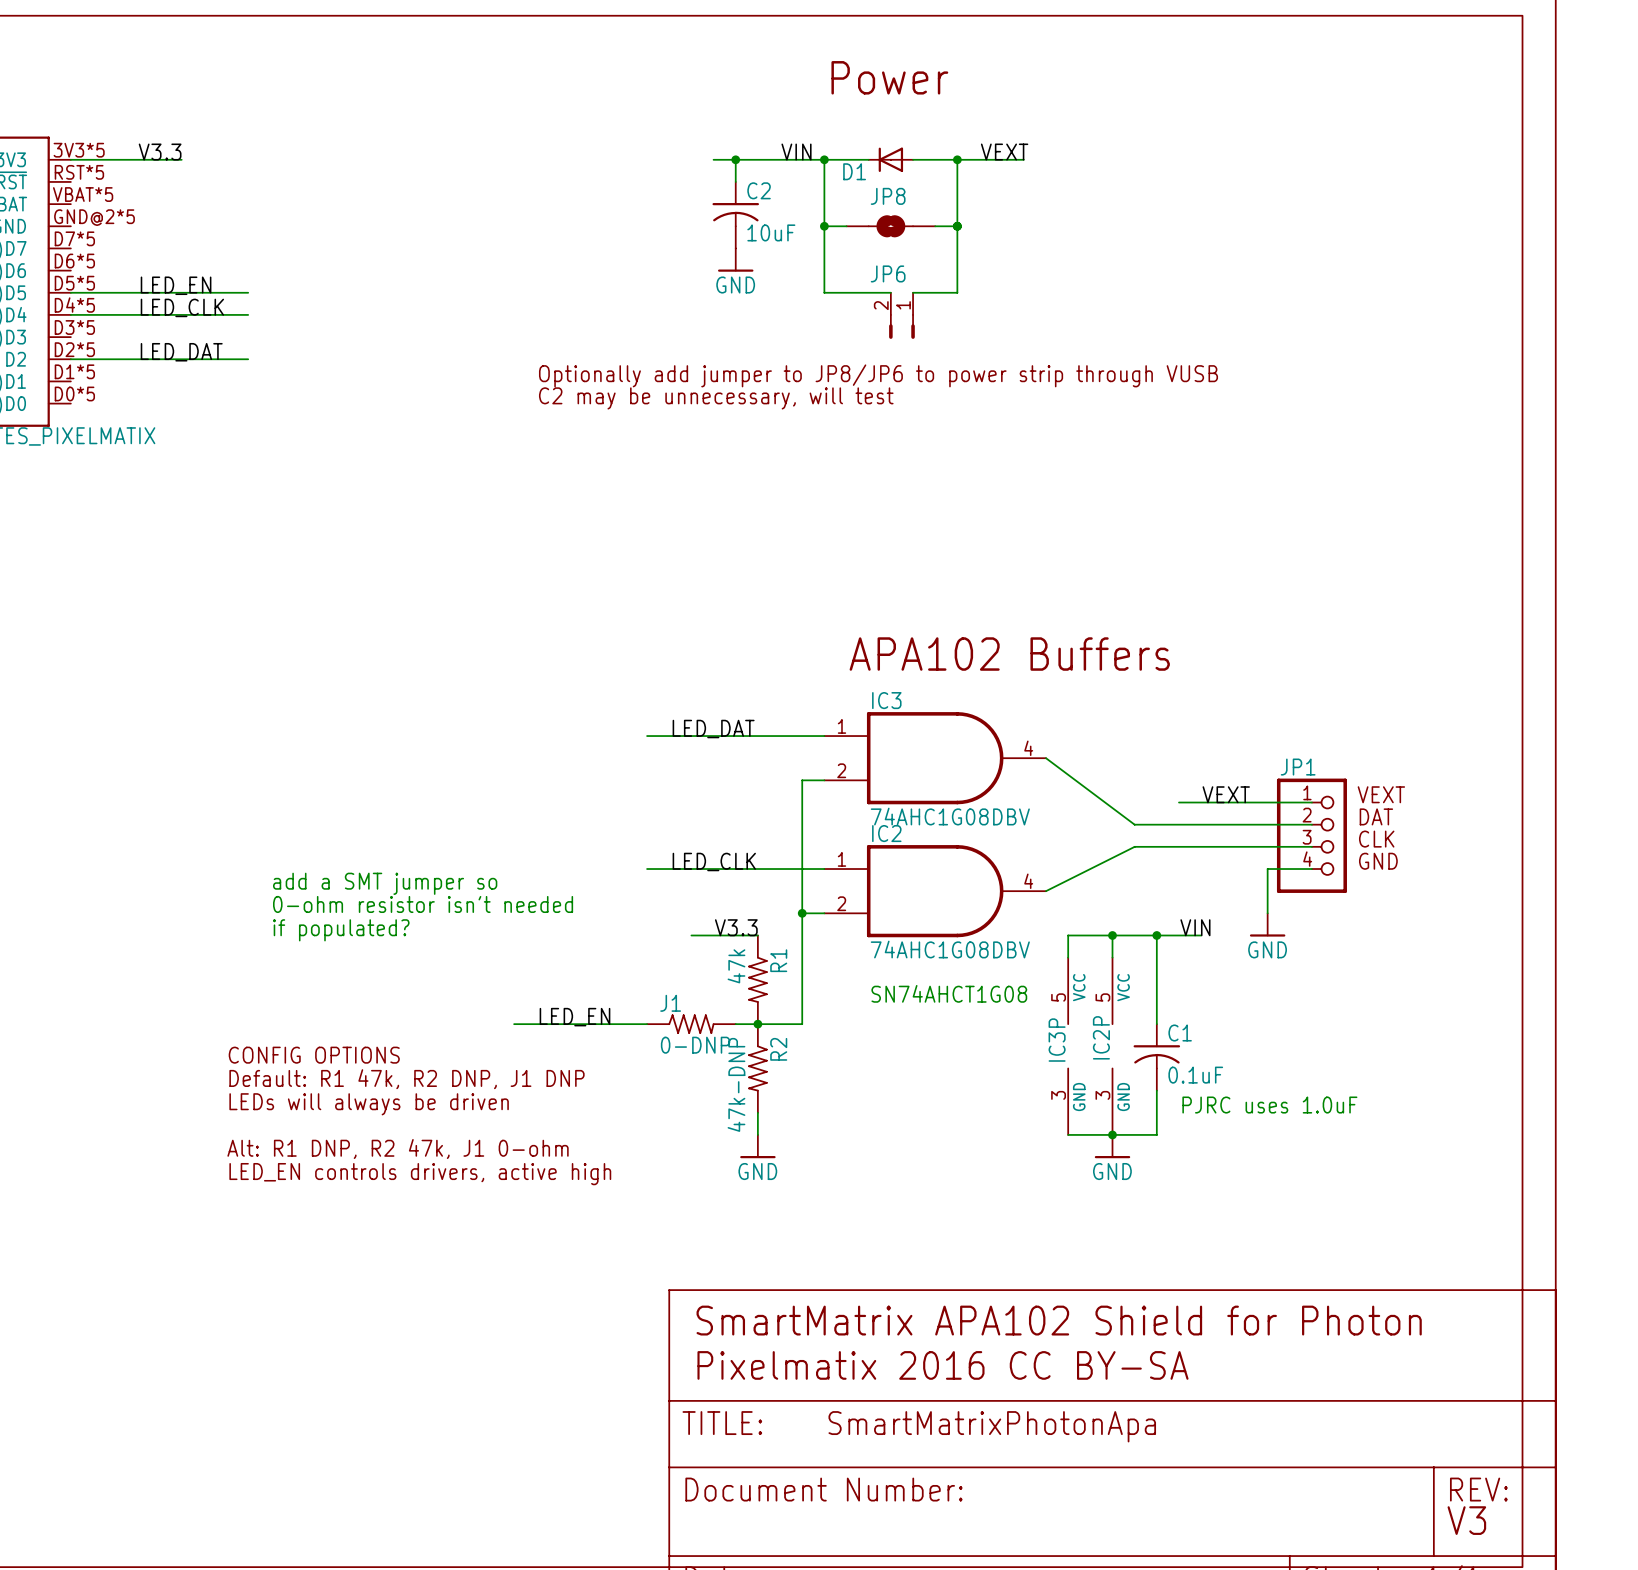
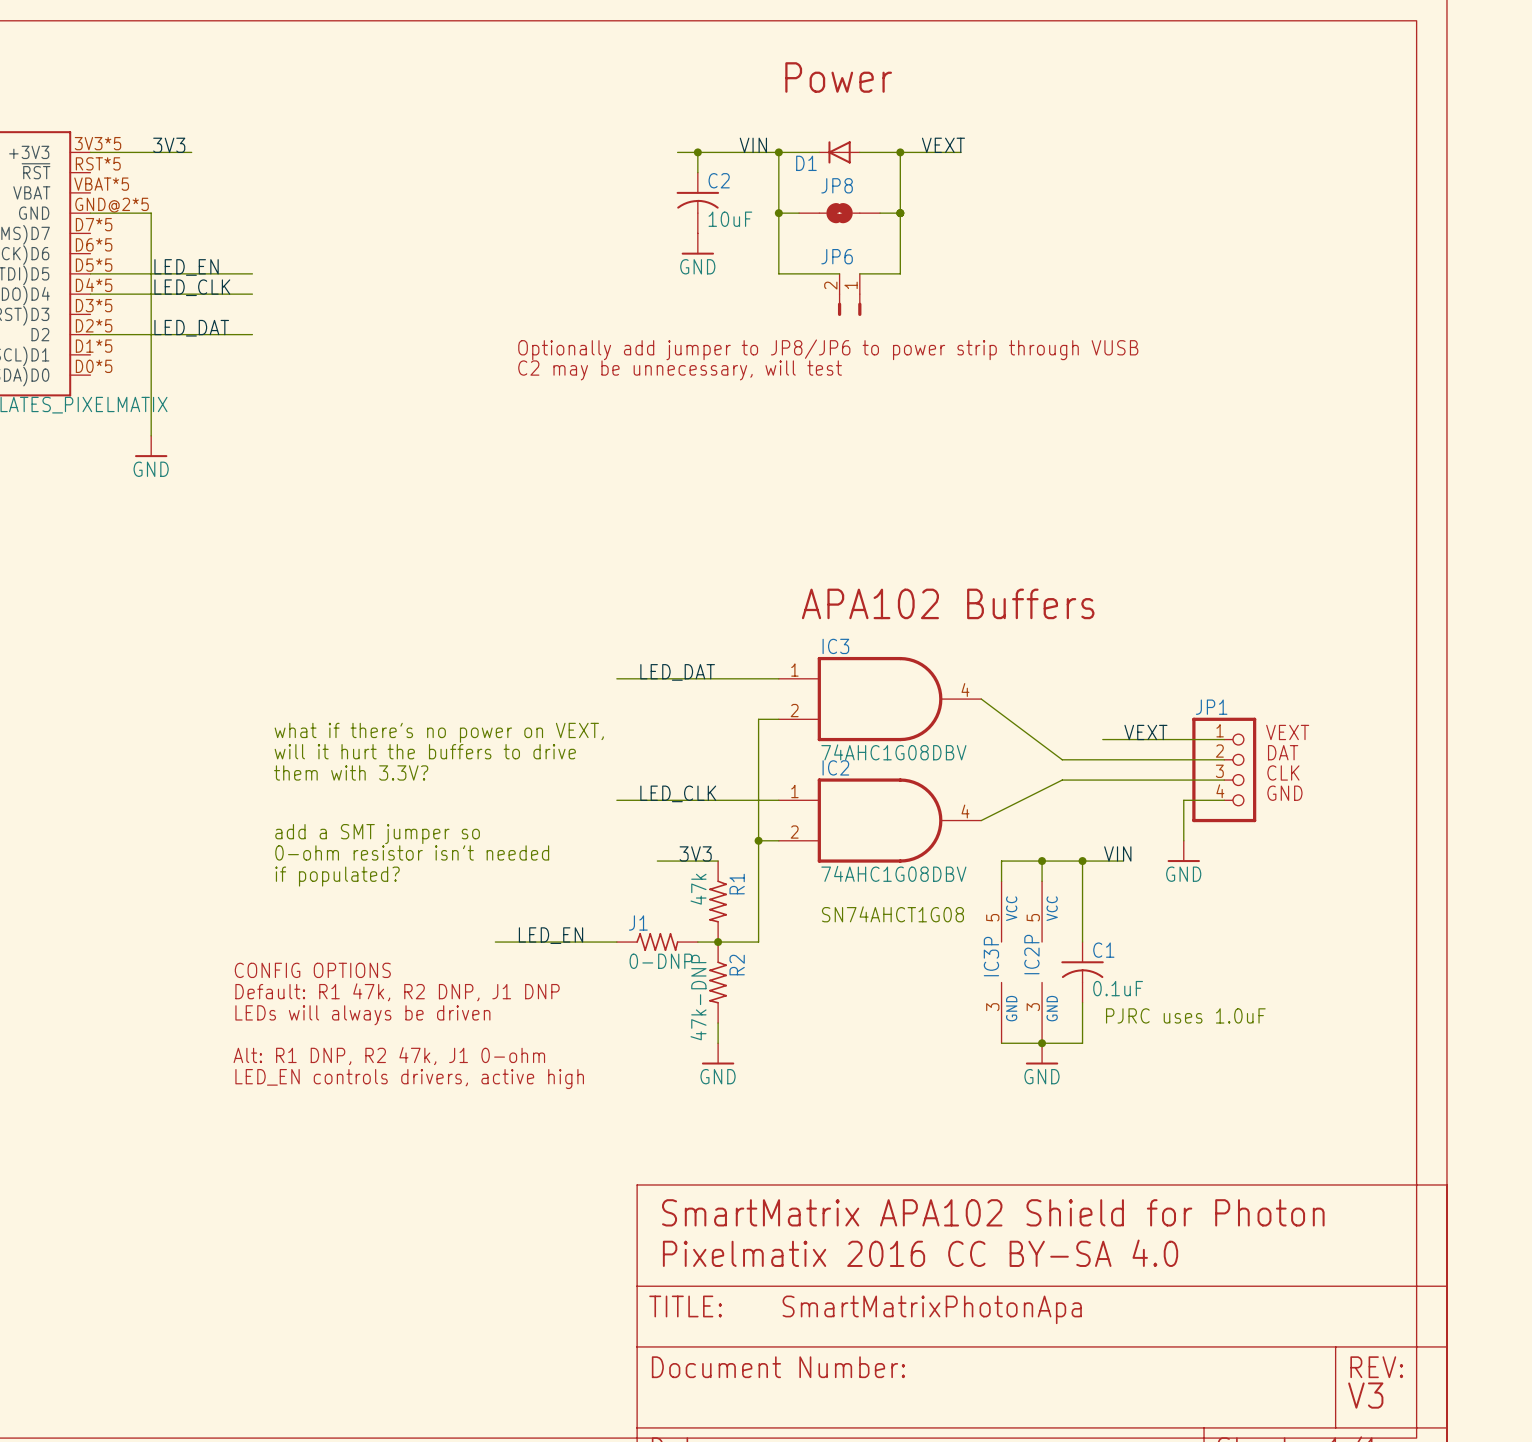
label: V3.3 (160, 152) -> 3V3 (169, 145)
wire: none -> (90, 213) (151, 213) (151, 435)
power symbol: none -> GND (151, 446)
text: none -> what if there's no power on VEXT, (439, 732)
text: none -> will it hurt the buffers to drive (425, 751)
text: none -> them with 3.3V? (351, 772)
text: add a SMT jumper so (385, 883) -> none
text: 0-ohm resistor isn't needed (423, 904) -> add a SMT jumper so (377, 834)
label: V3.3 (736, 927) -> 3V3 (695, 853)
text: if populated? (341, 930) -> 0-ohm resistor isn't needed (412, 852)
text: none -> if populated? (337, 876)
text: Pixelmatix 2016 CC BY-SA (943, 1365) -> Pixelmatix 2016 CC BY-SA 4.0 (920, 1253)

